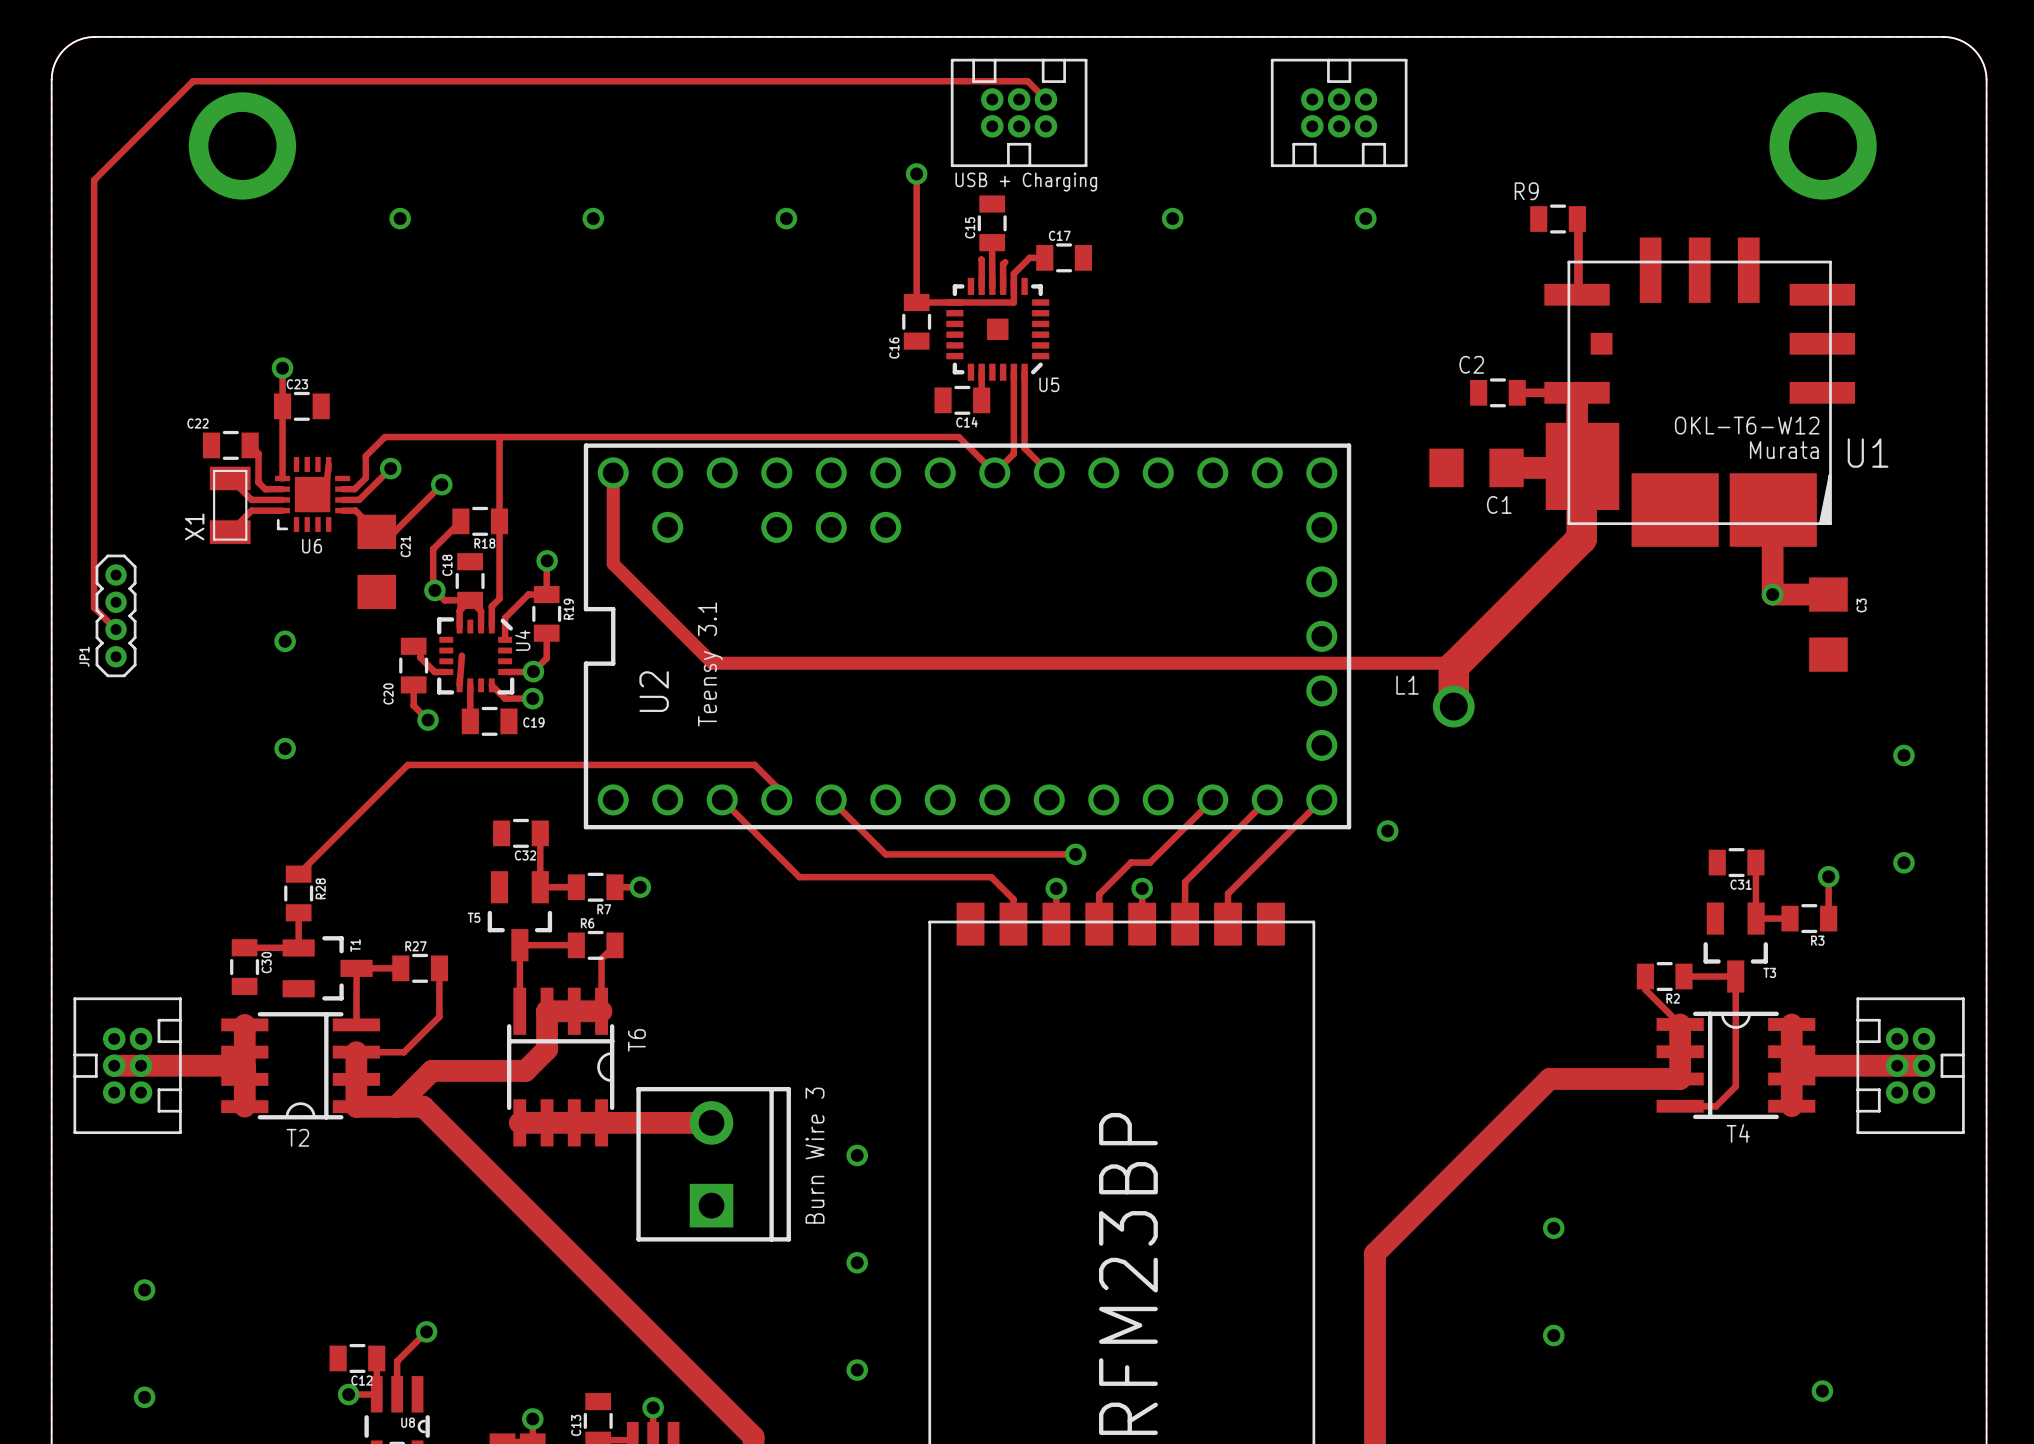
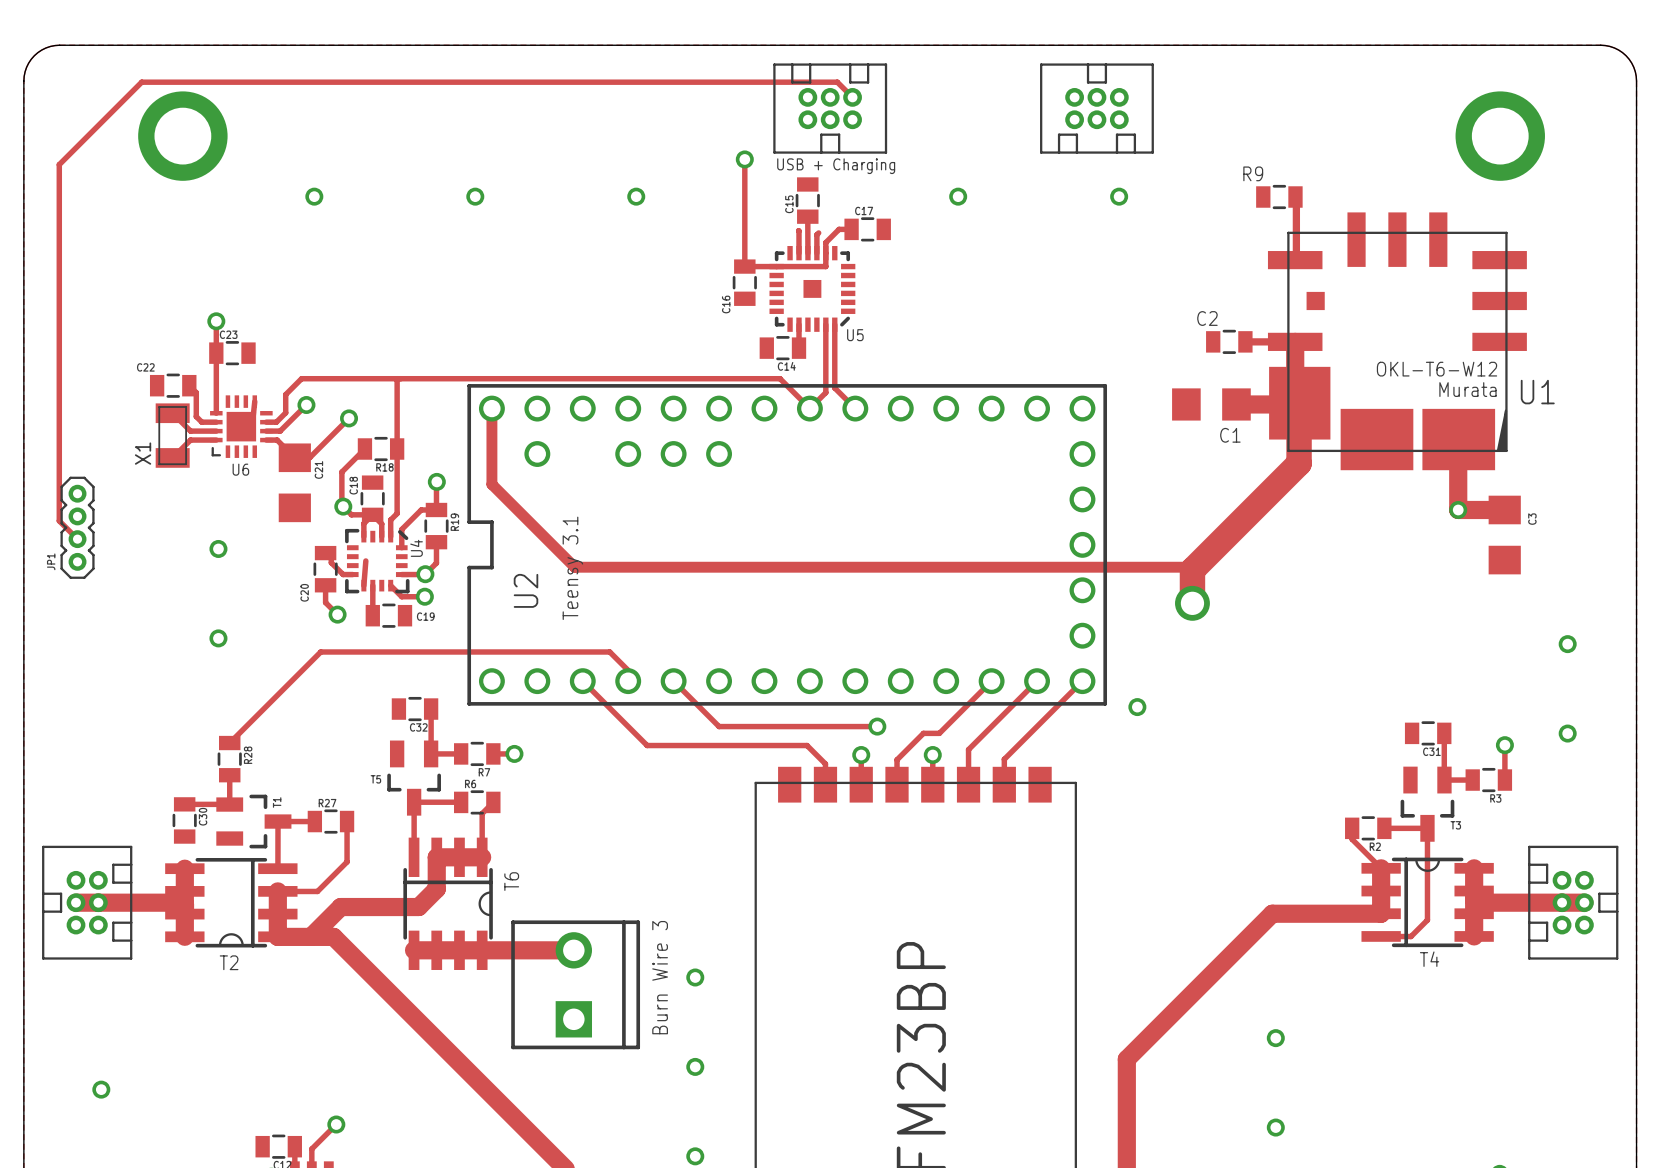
text: L1 (1407, 685) -> none

